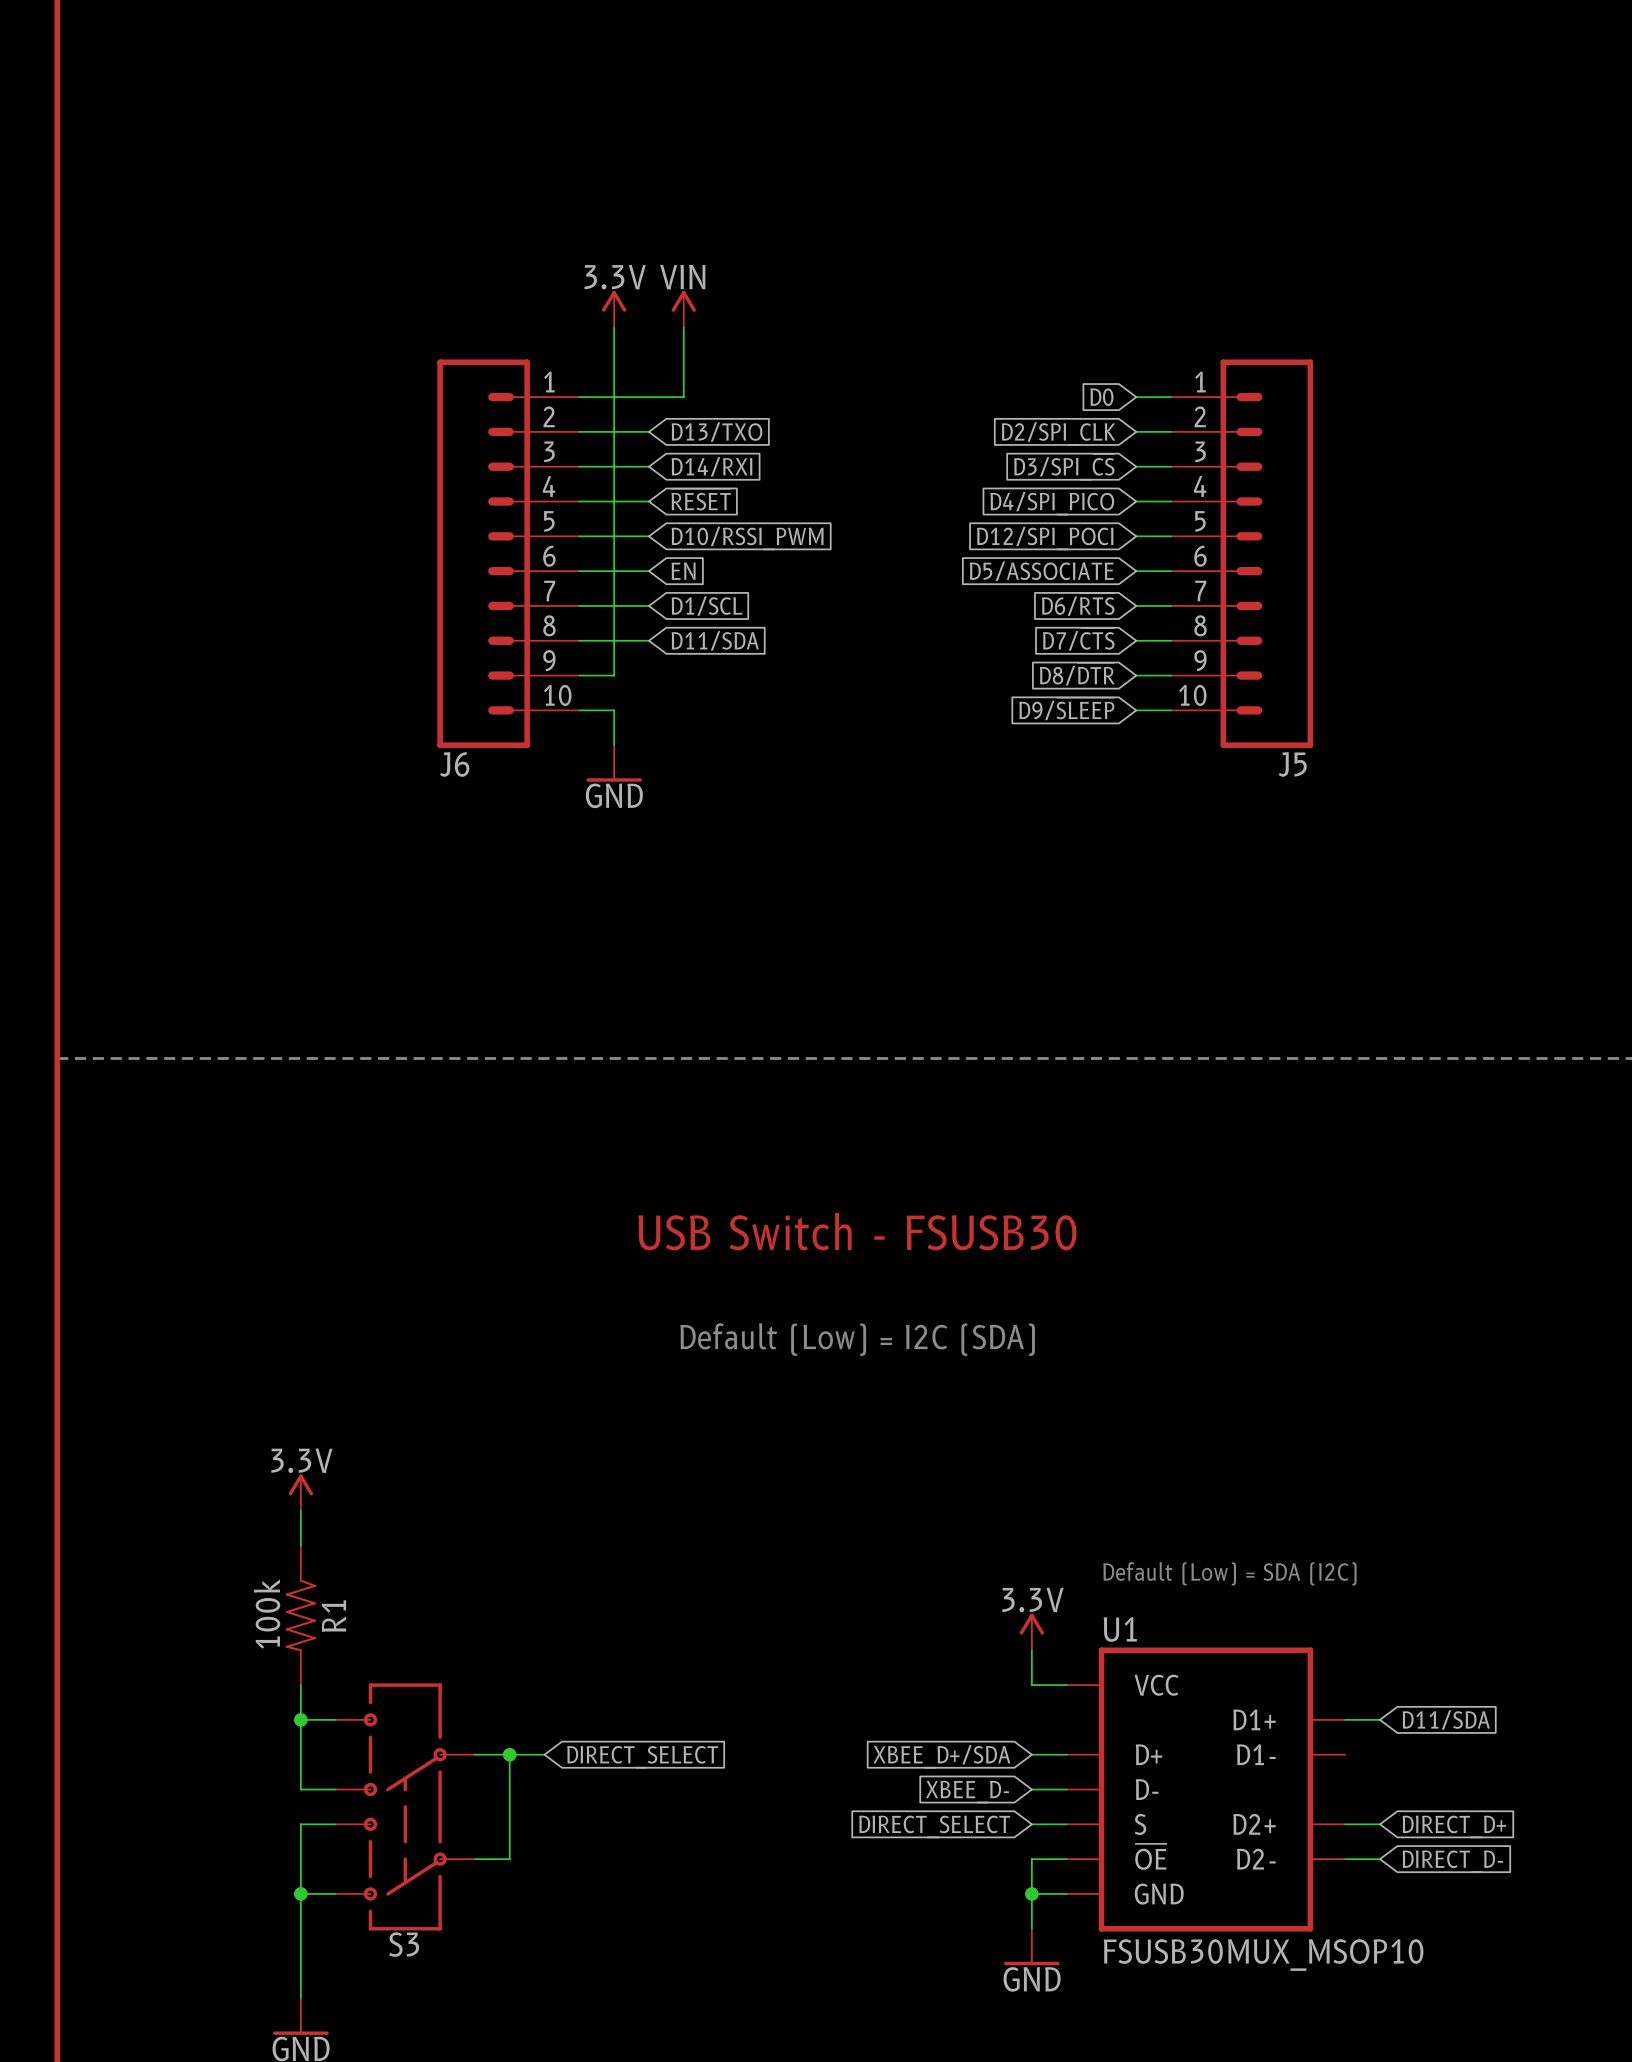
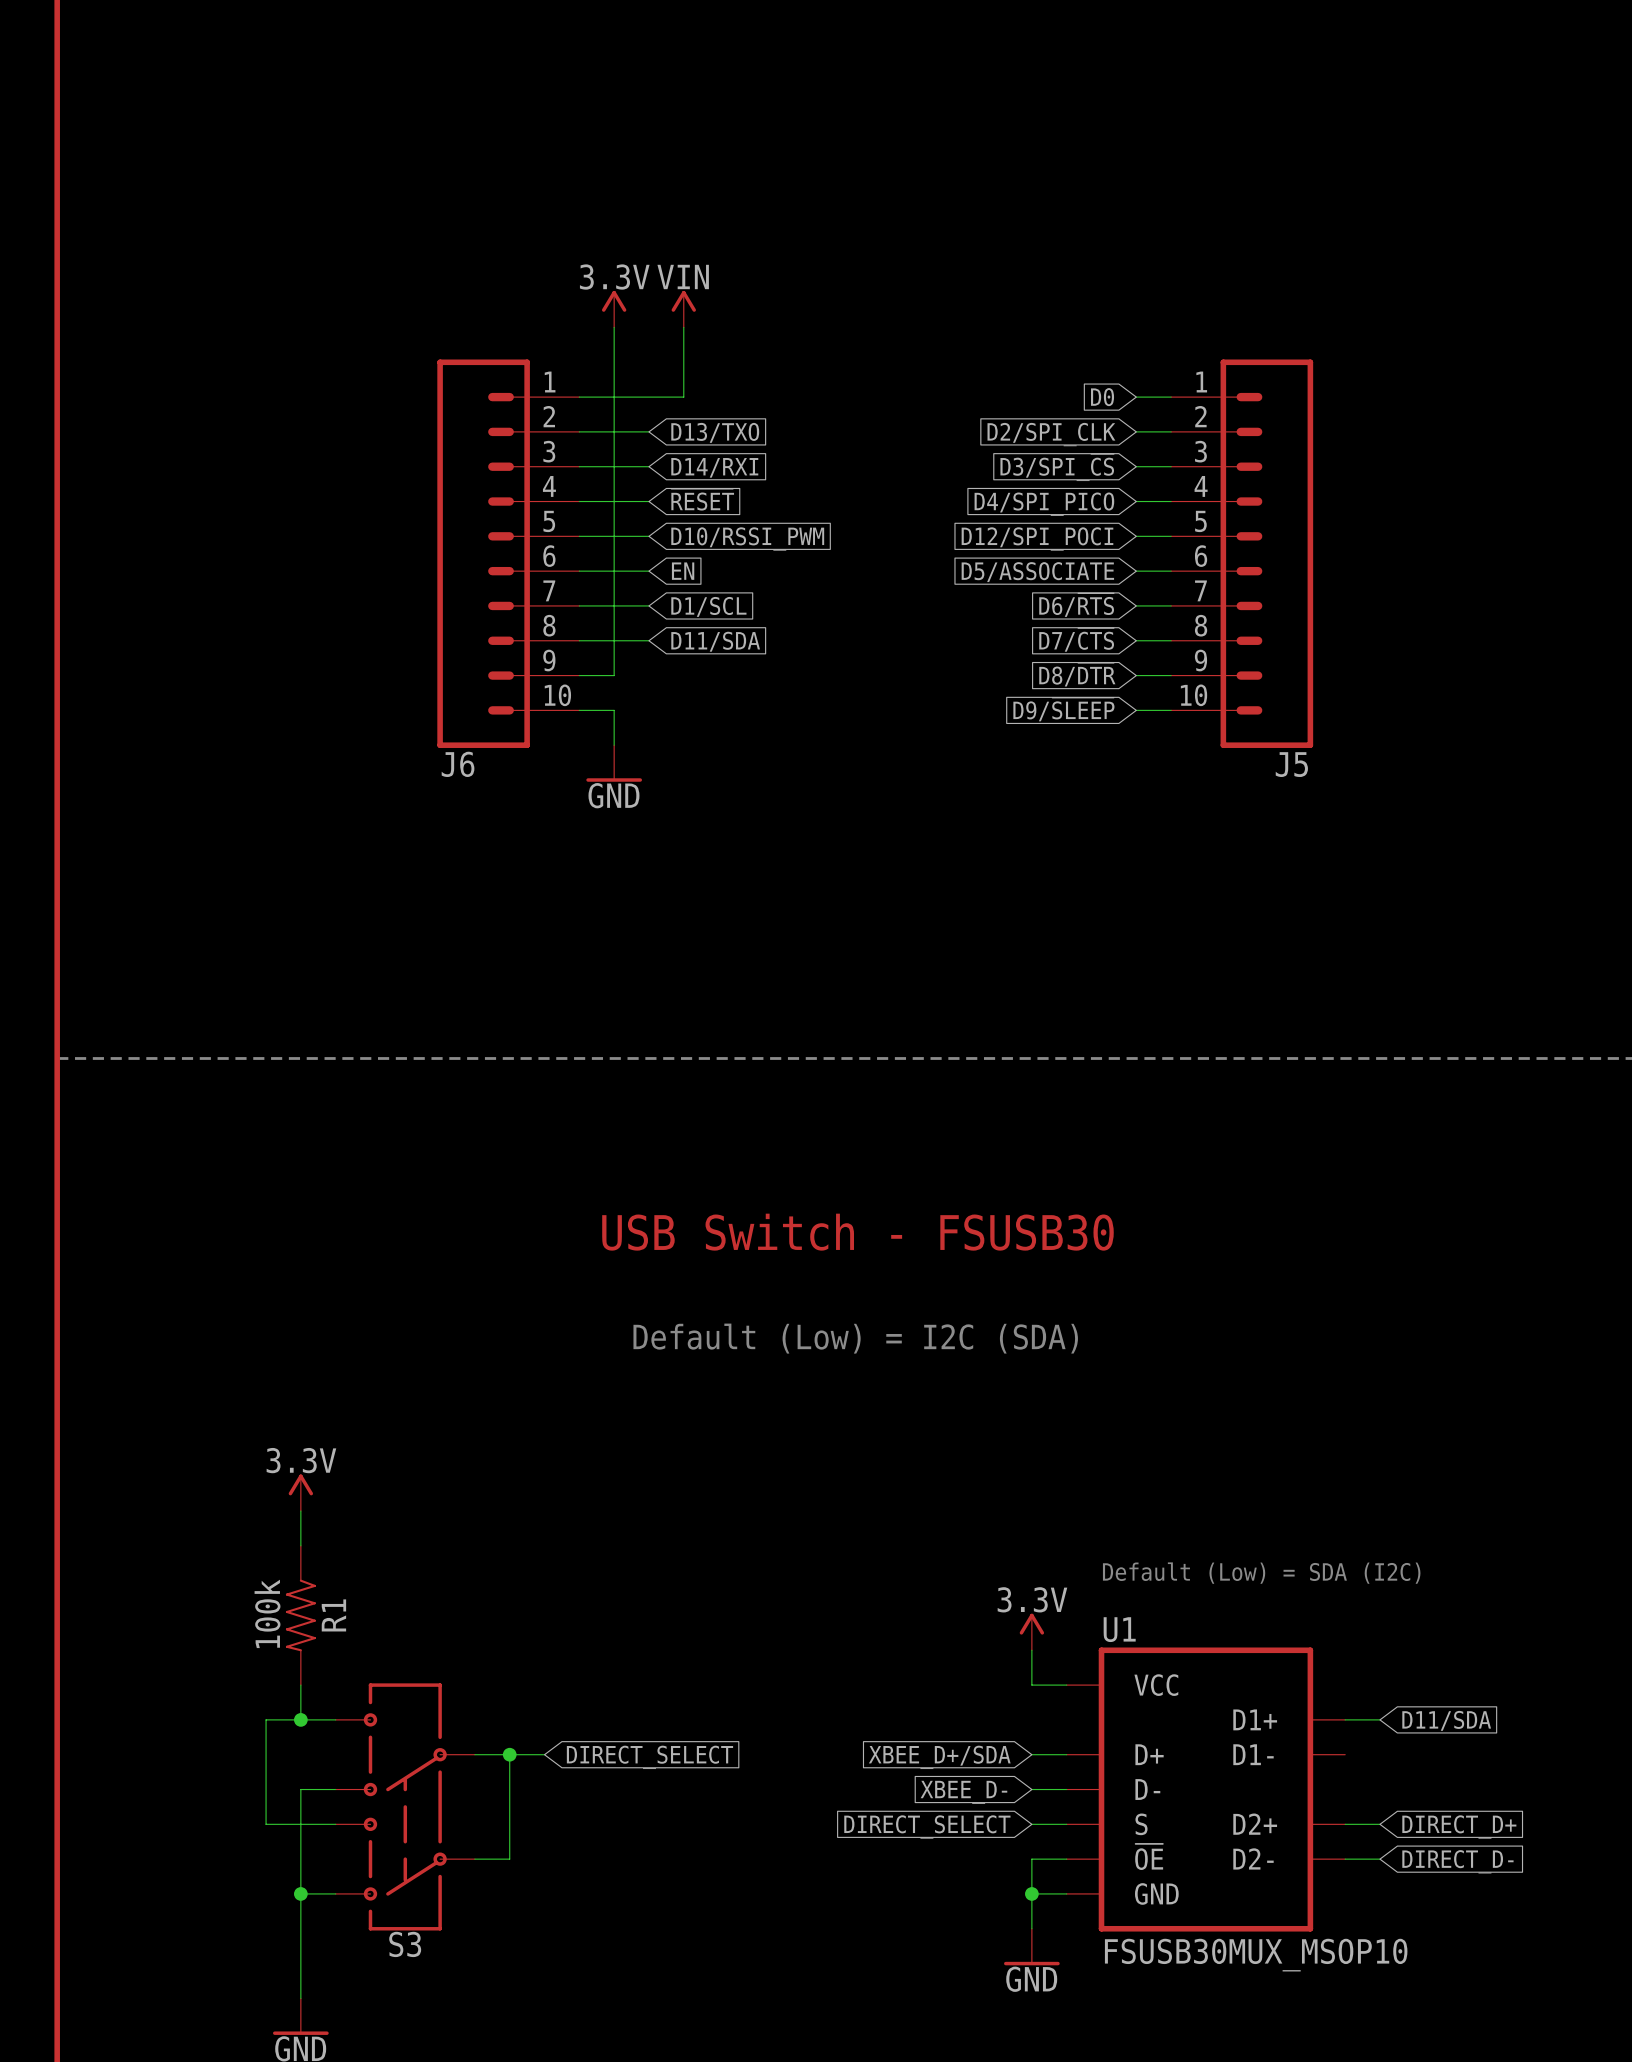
wire: (300, 1719) (300, 1789) -> (300, 1719) (266, 1719) (266, 1824) (300, 1824) (300, 1789)

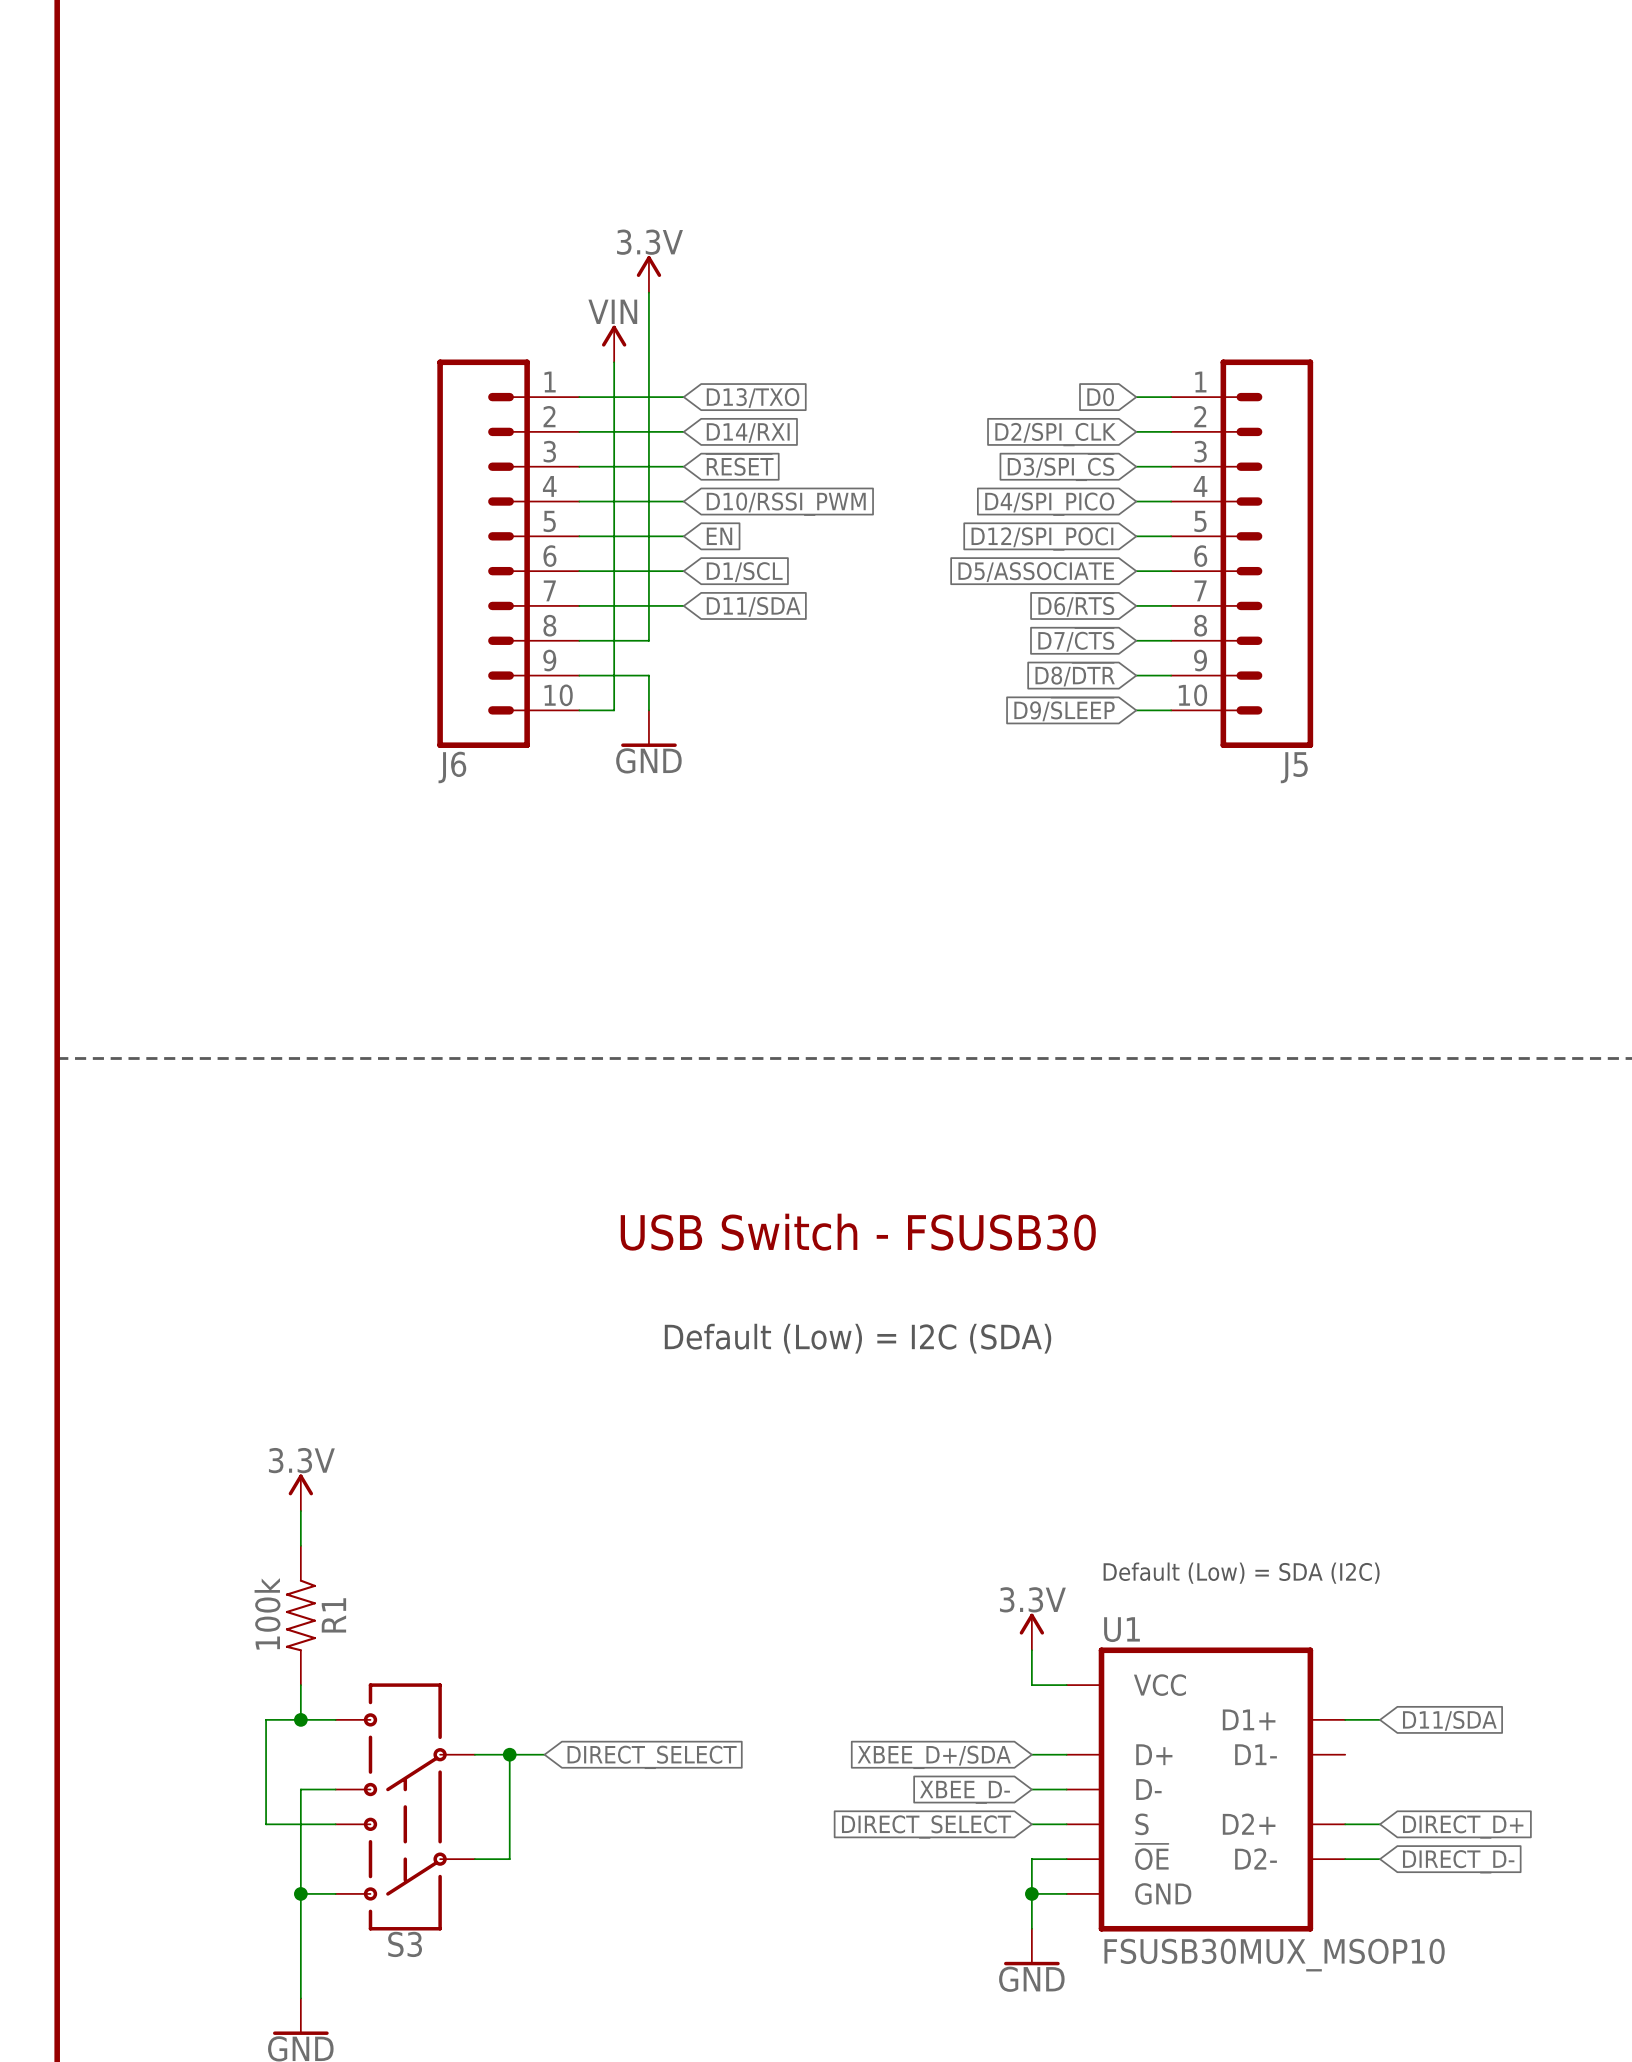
wire: none -> (648, 292) (648, 640)
power symbol position: 3.3V (614, 309) -> 3.3V (648, 274)
power symbol position: VIN (683, 309) -> VIN (614, 344)
wire: (683, 327) (683, 397) -> none
wire: none -> (648, 431) (683, 431)
global label position: D13/TXO (715, 432) -> D13/TXO (753, 398)
wire: none -> (648, 466) (683, 466)
global label position: D14/RXI (714, 467) -> D14/RXI (748, 433)
global label position: ~{RESET} (702, 499) -> ~{RESET} (739, 464)
wire: none -> (648, 501) (683, 501)
wire: none -> (648, 536) (683, 536)
global label position: D10/RSSI_PWM (747, 538) -> D10/RSSI_PWM (786, 504)
wire: none -> (648, 571) (683, 571)
global label position: EN (683, 571) -> EN (719, 536)
wire: none -> (648, 605) (683, 605)
global label position: D1/SCL (708, 606) -> D1/SCL (744, 572)
global label position: D11/SDA (715, 641) -> D11/SDA (753, 606)
wire: (614, 710) (614, 745) -> (614, 710) (614, 675) (648, 675) (648, 710)
power symbol position: GND (614, 763) -> GND (648, 728)

